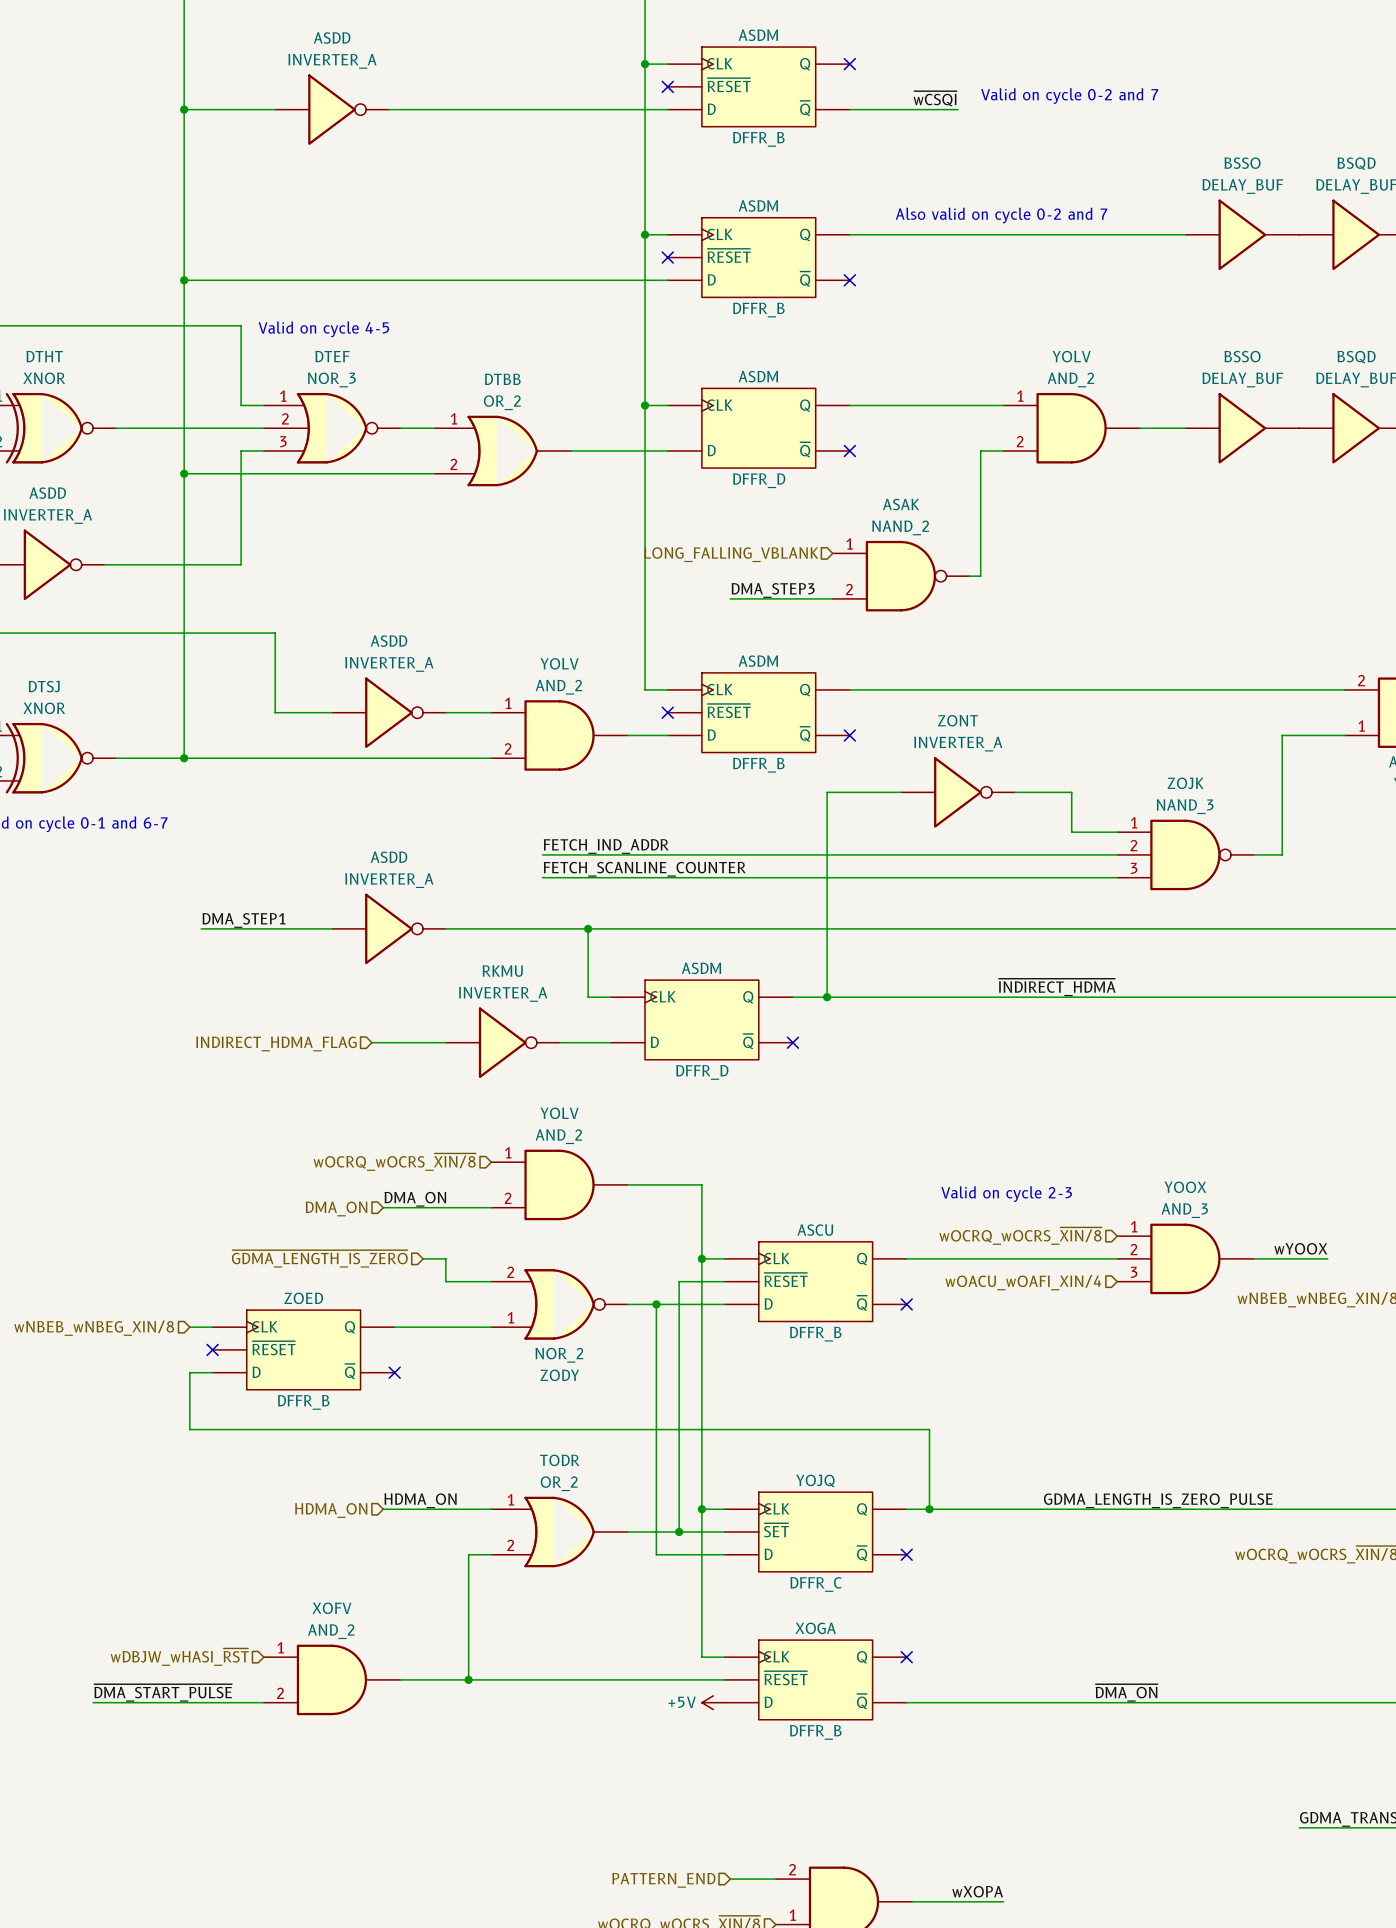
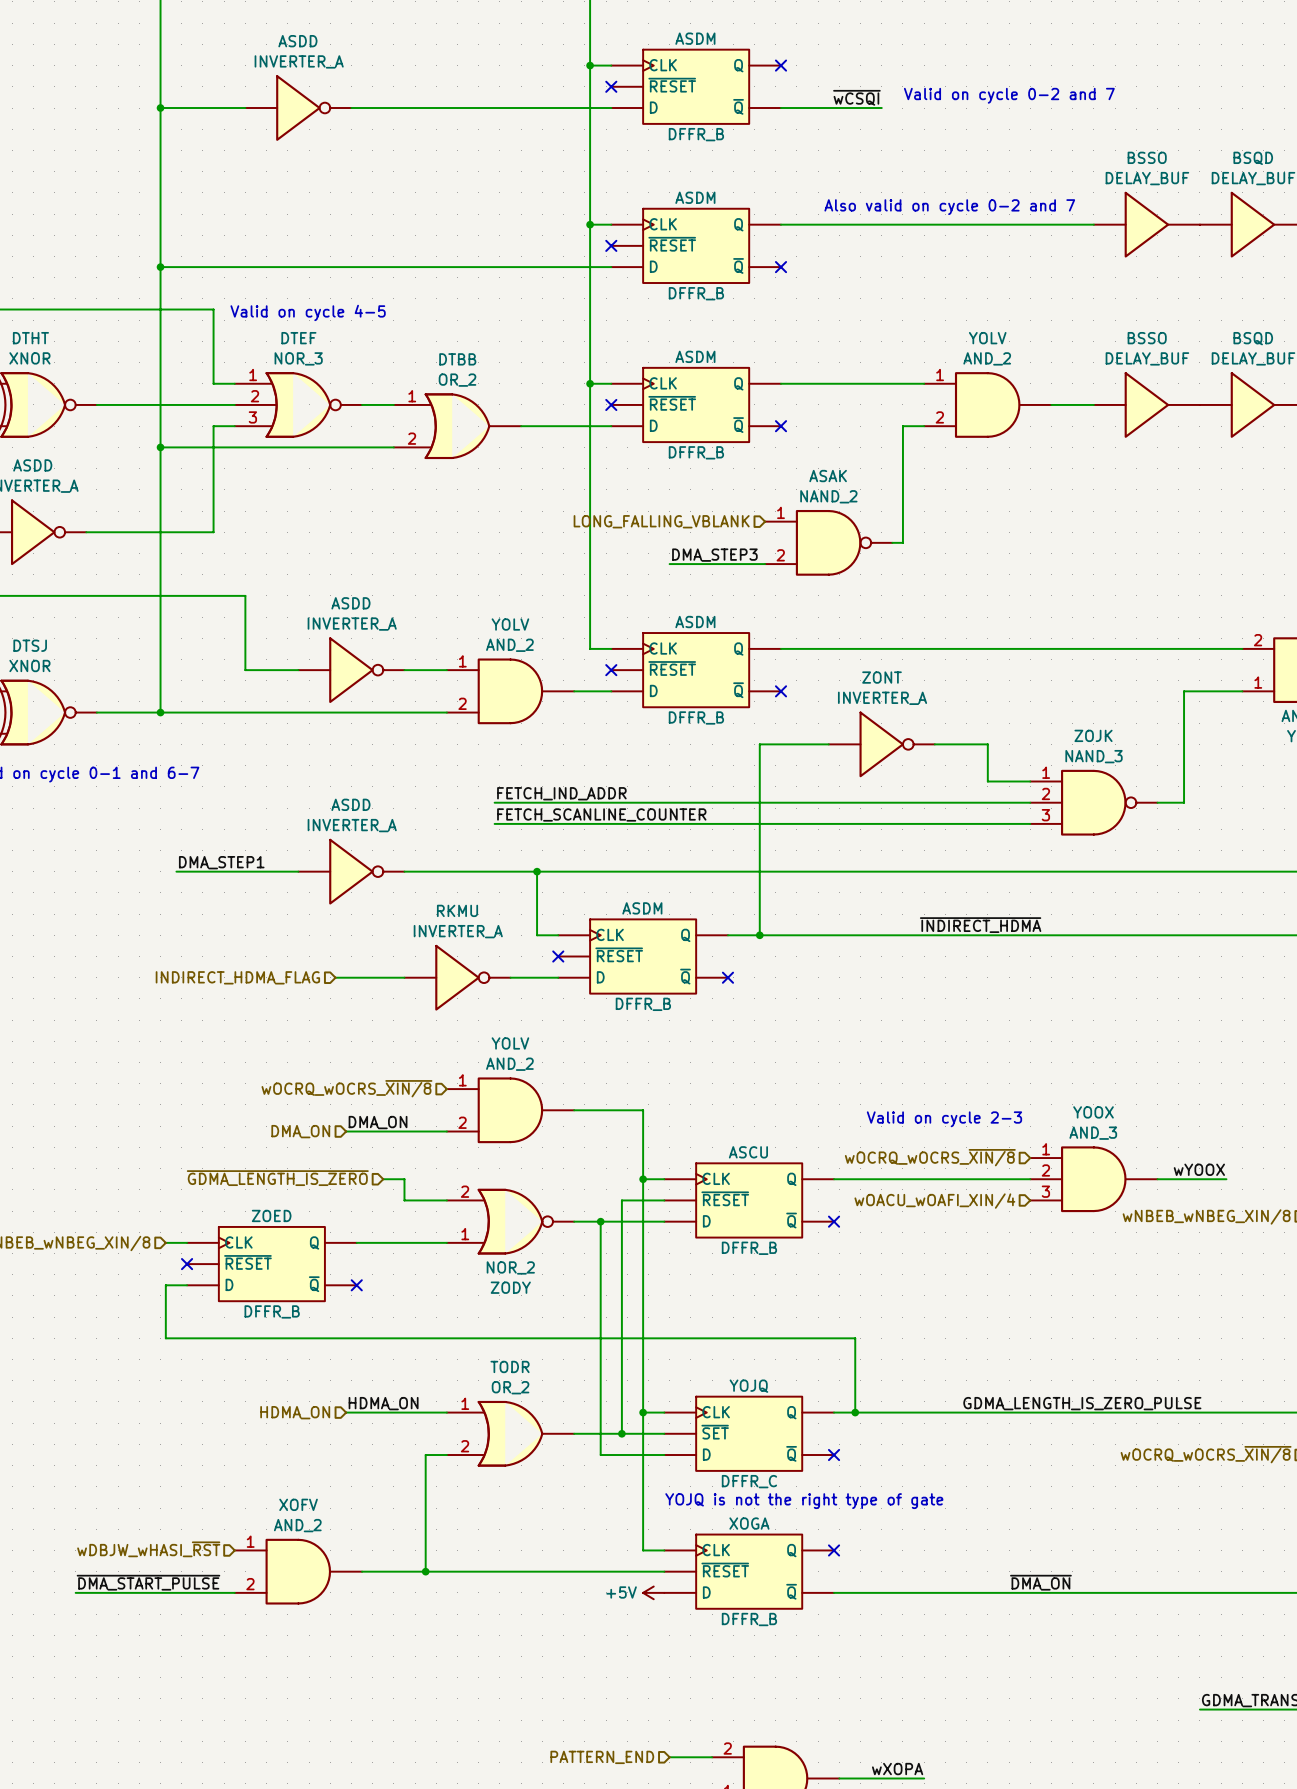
ASDM symbol: [667, 388, 850, 469] -> [611, 367, 782, 443]
no-connect mark: none -> (611, 404)
ASDM value: DFFR_D (759, 480) -> DFFR_B (696, 452)
ASDM symbol: [610, 980, 793, 1060] -> [558, 919, 728, 994]
no-connect mark: none -> (558, 956)
ASDM value: DFFR_D (702, 1072) -> DFFR_B (643, 1004)
text: none -> YOJQ is not the right type of gate (804, 1501)

